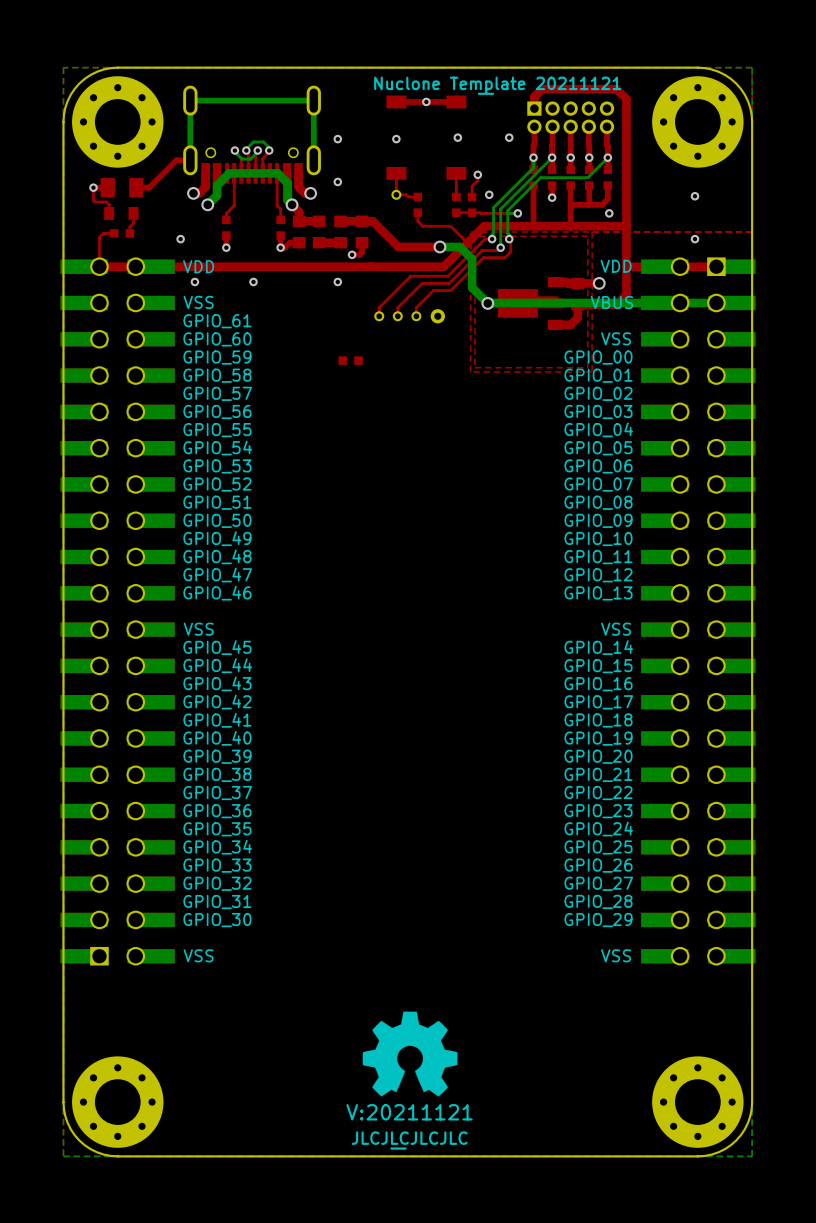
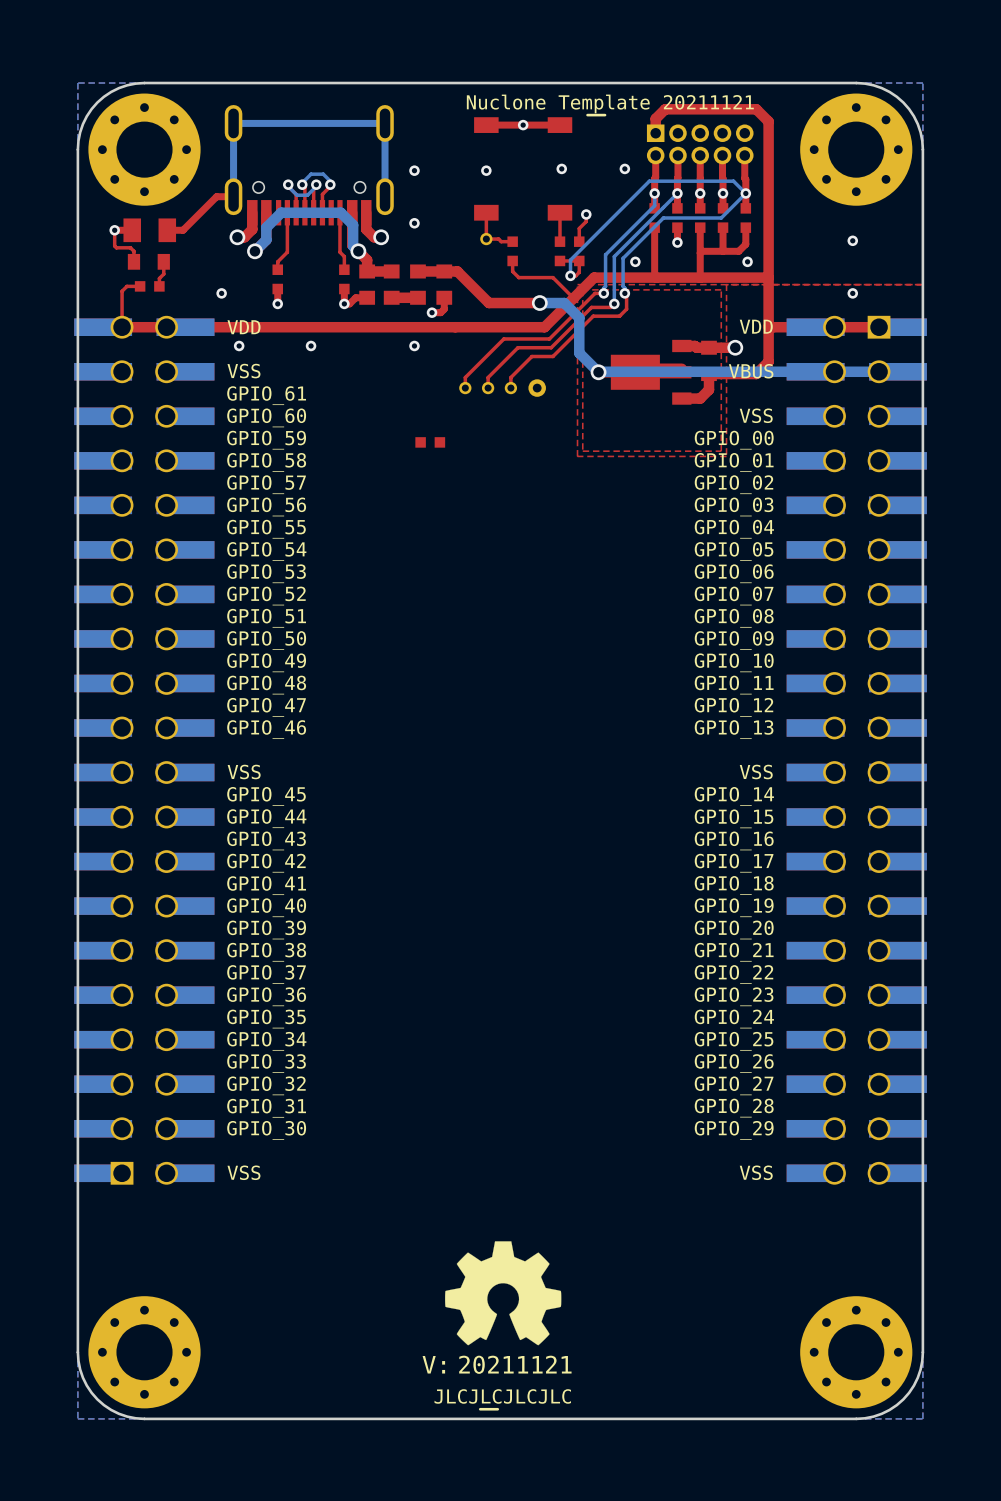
bottom track: none -> (745, 193) (733, 181) (649, 181) (570, 260) (570, 275)
via position: (489, 194) -> (570, 275)
top track: (472, 212) (517, 213) -> (579, 260) (579, 272) (575, 275) (570, 275)
bottom track: (517, 213) (507, 213) -> none

